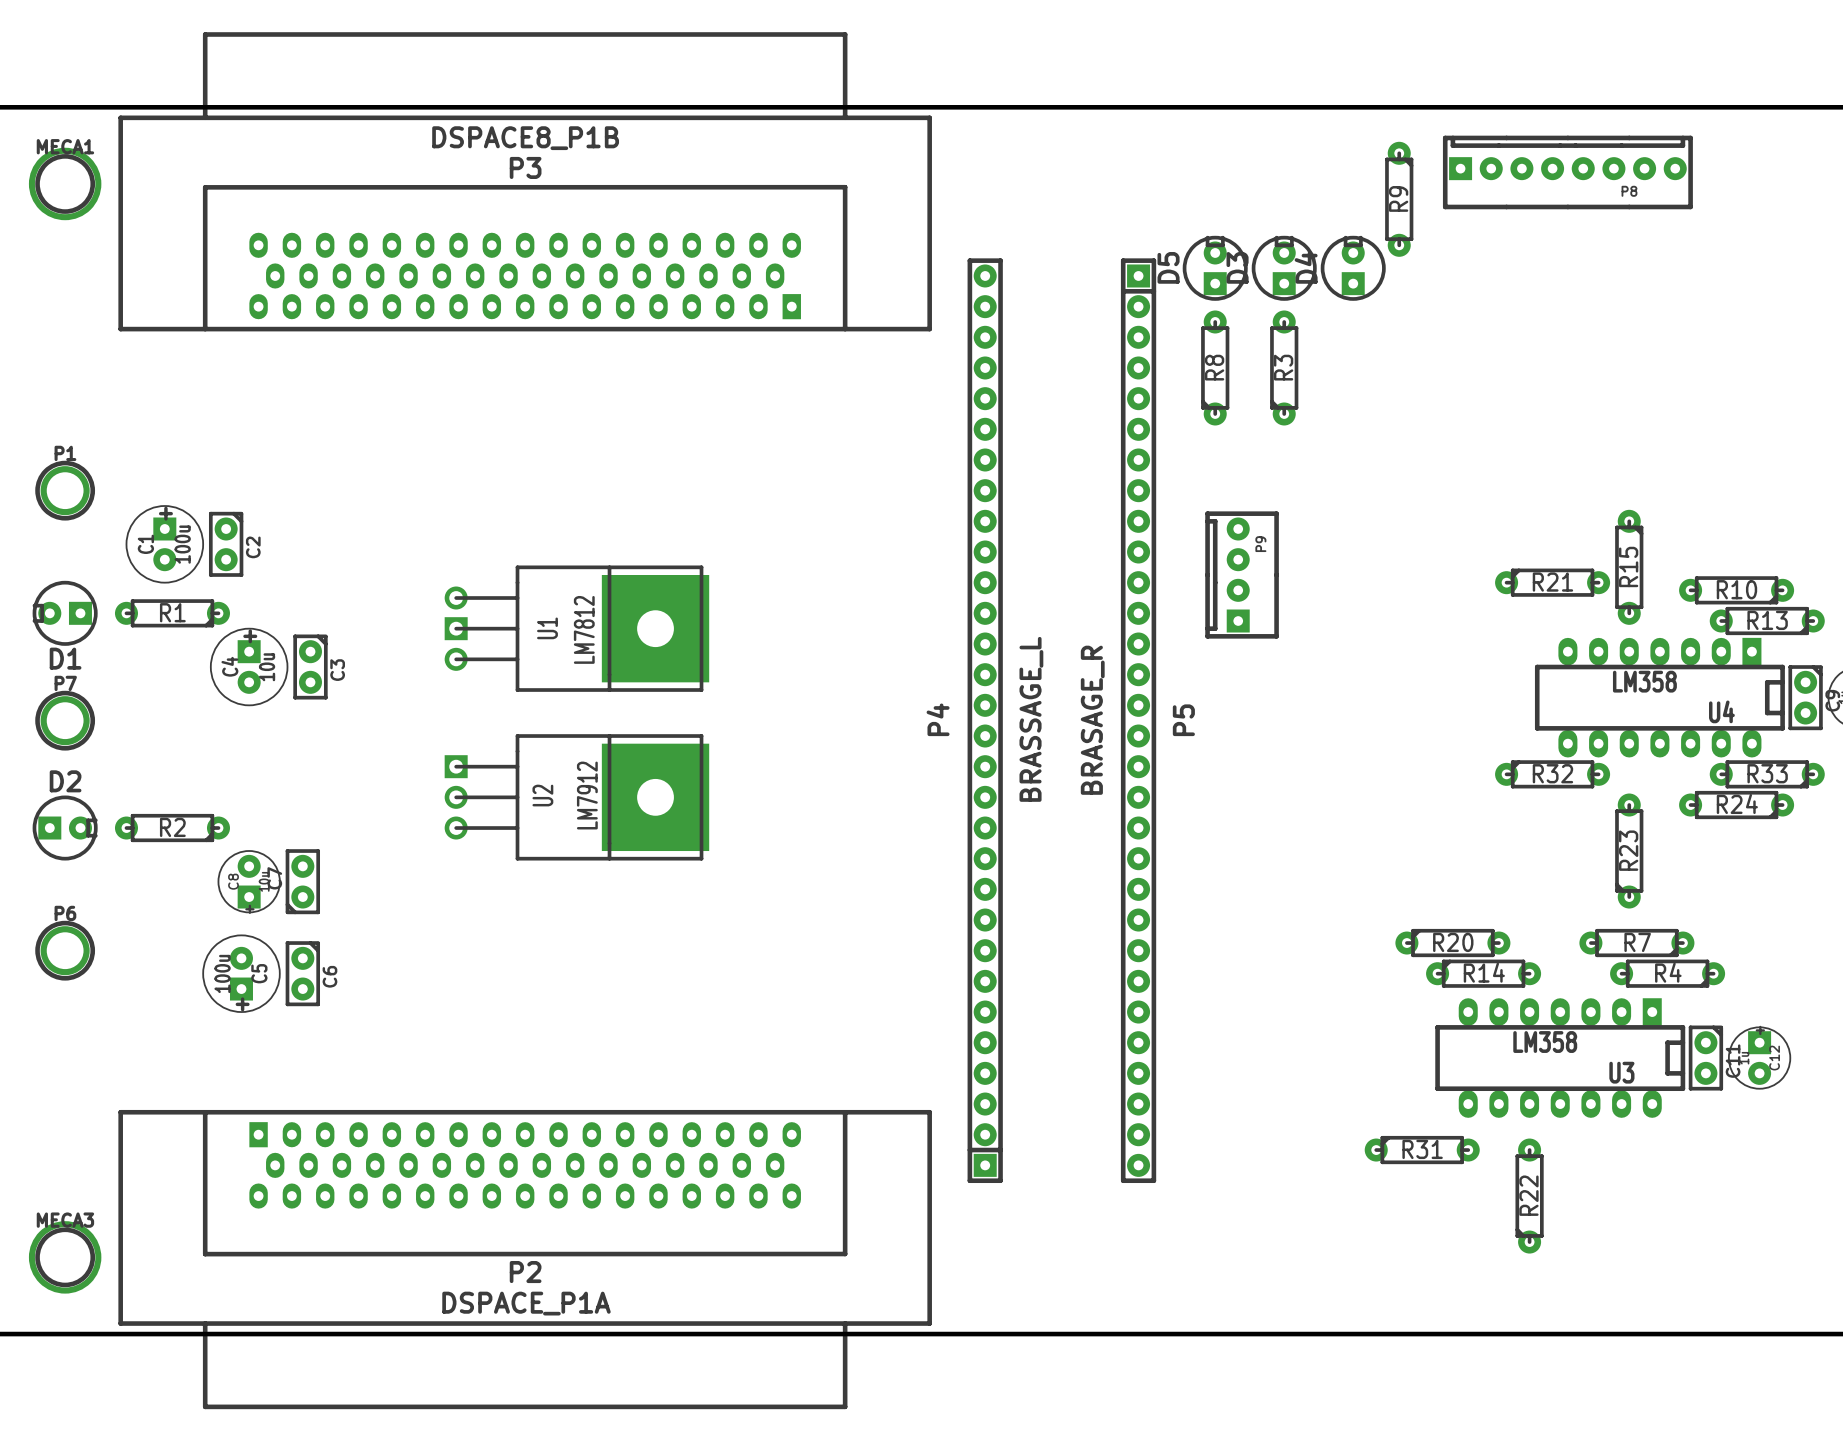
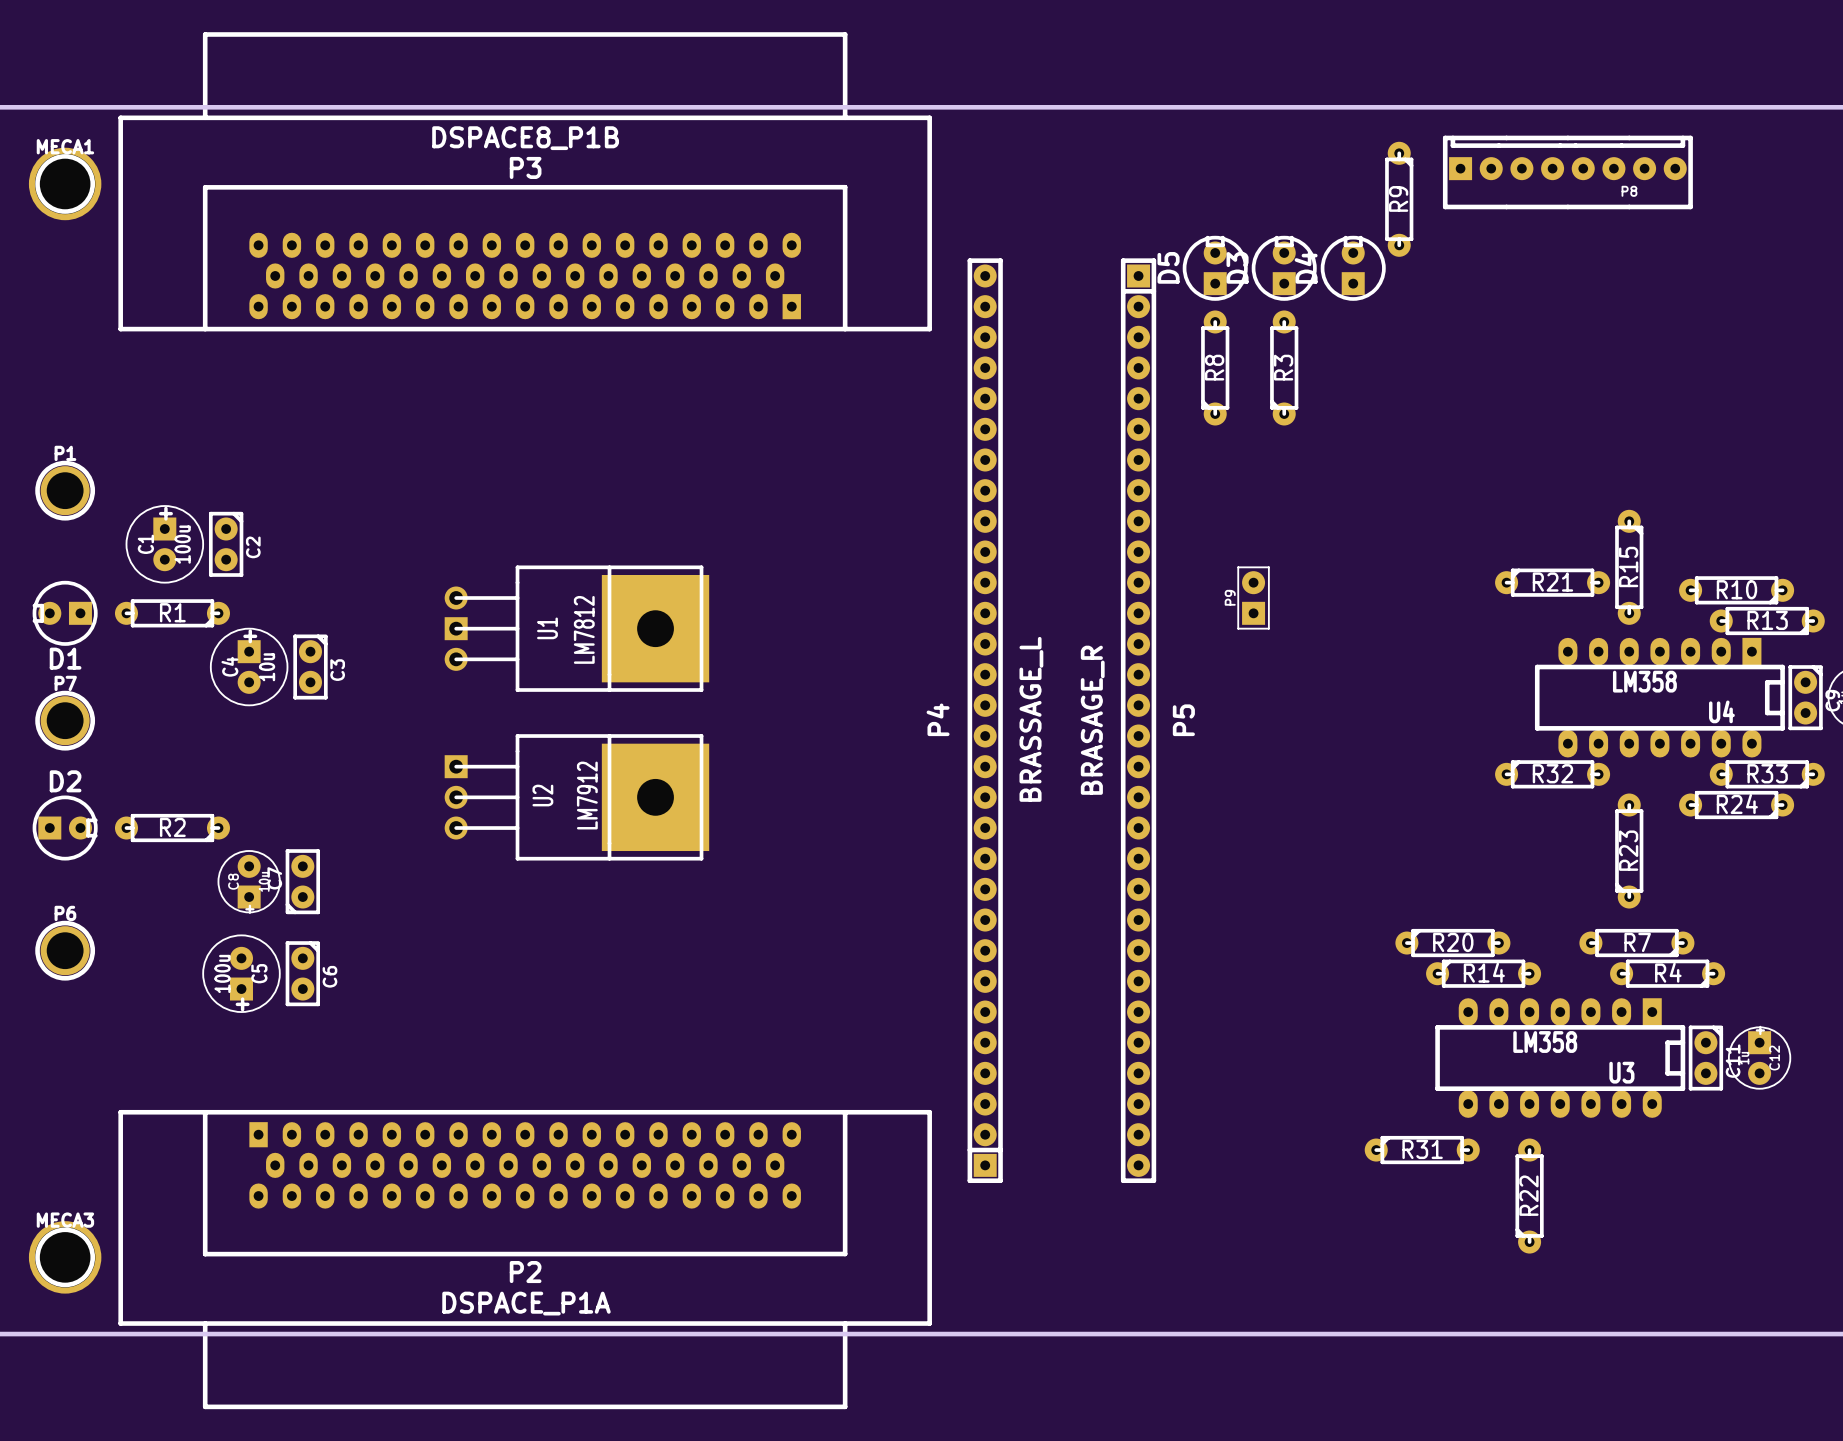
P9 footprint: [1205, 511, 1279, 639] -> [1237, 566, 1270, 630]
P9 name position: P9 (1260, 544) -> P9 (1230, 597)

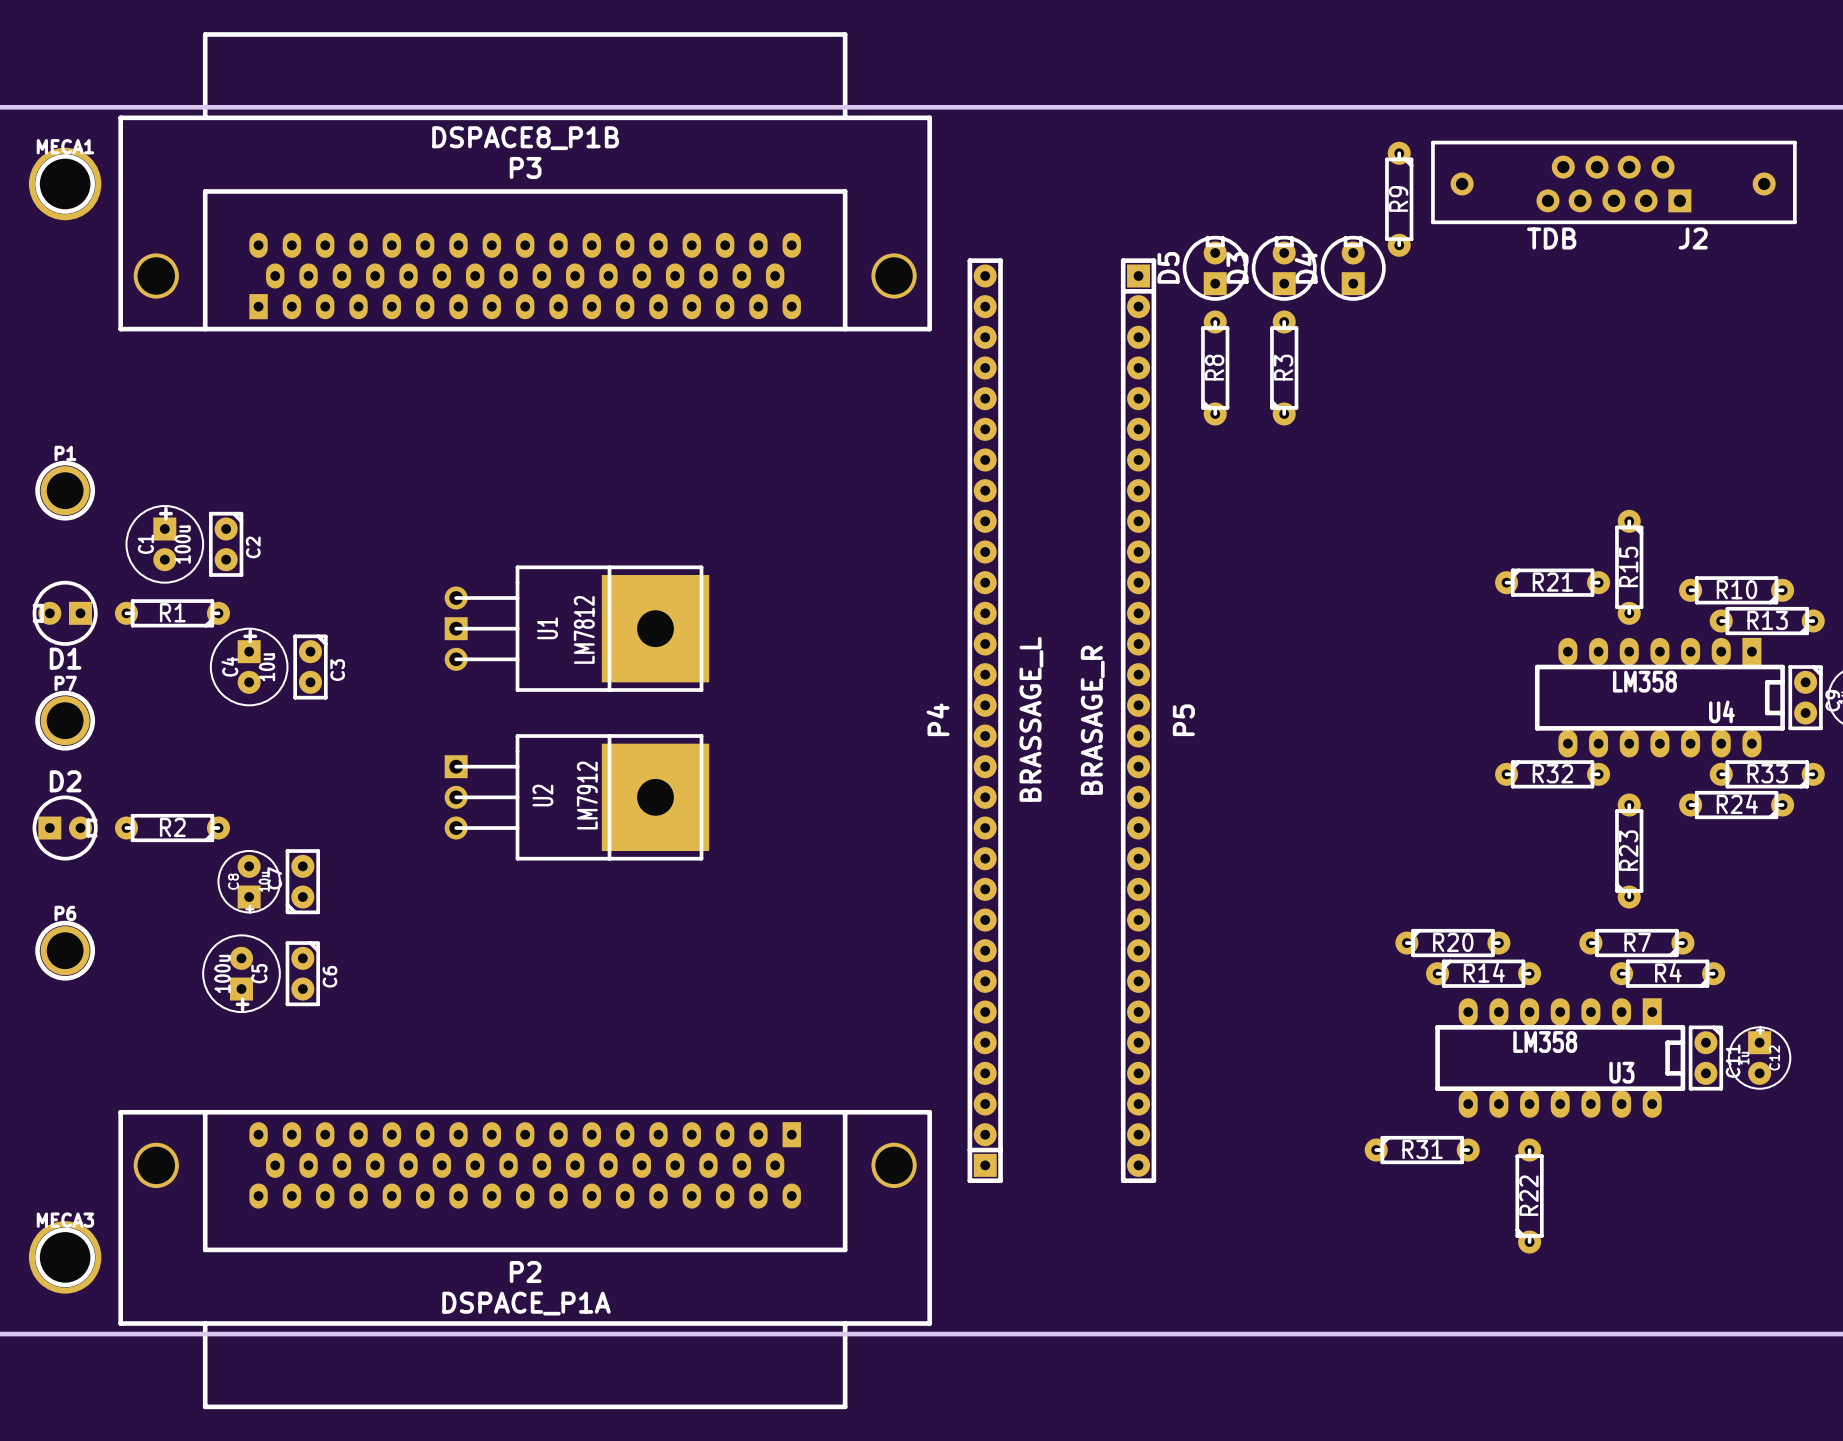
P3 footprint: [118, 32, 932, 332] -> [118, 32, 932, 332]
P8: (1567, 172) -> none
J2: none -> TDB (1613, 182)
P9: (1253, 598) -> none
P2 footprint: [118, 1109, 932, 1410] -> [118, 1109, 932, 1410]

